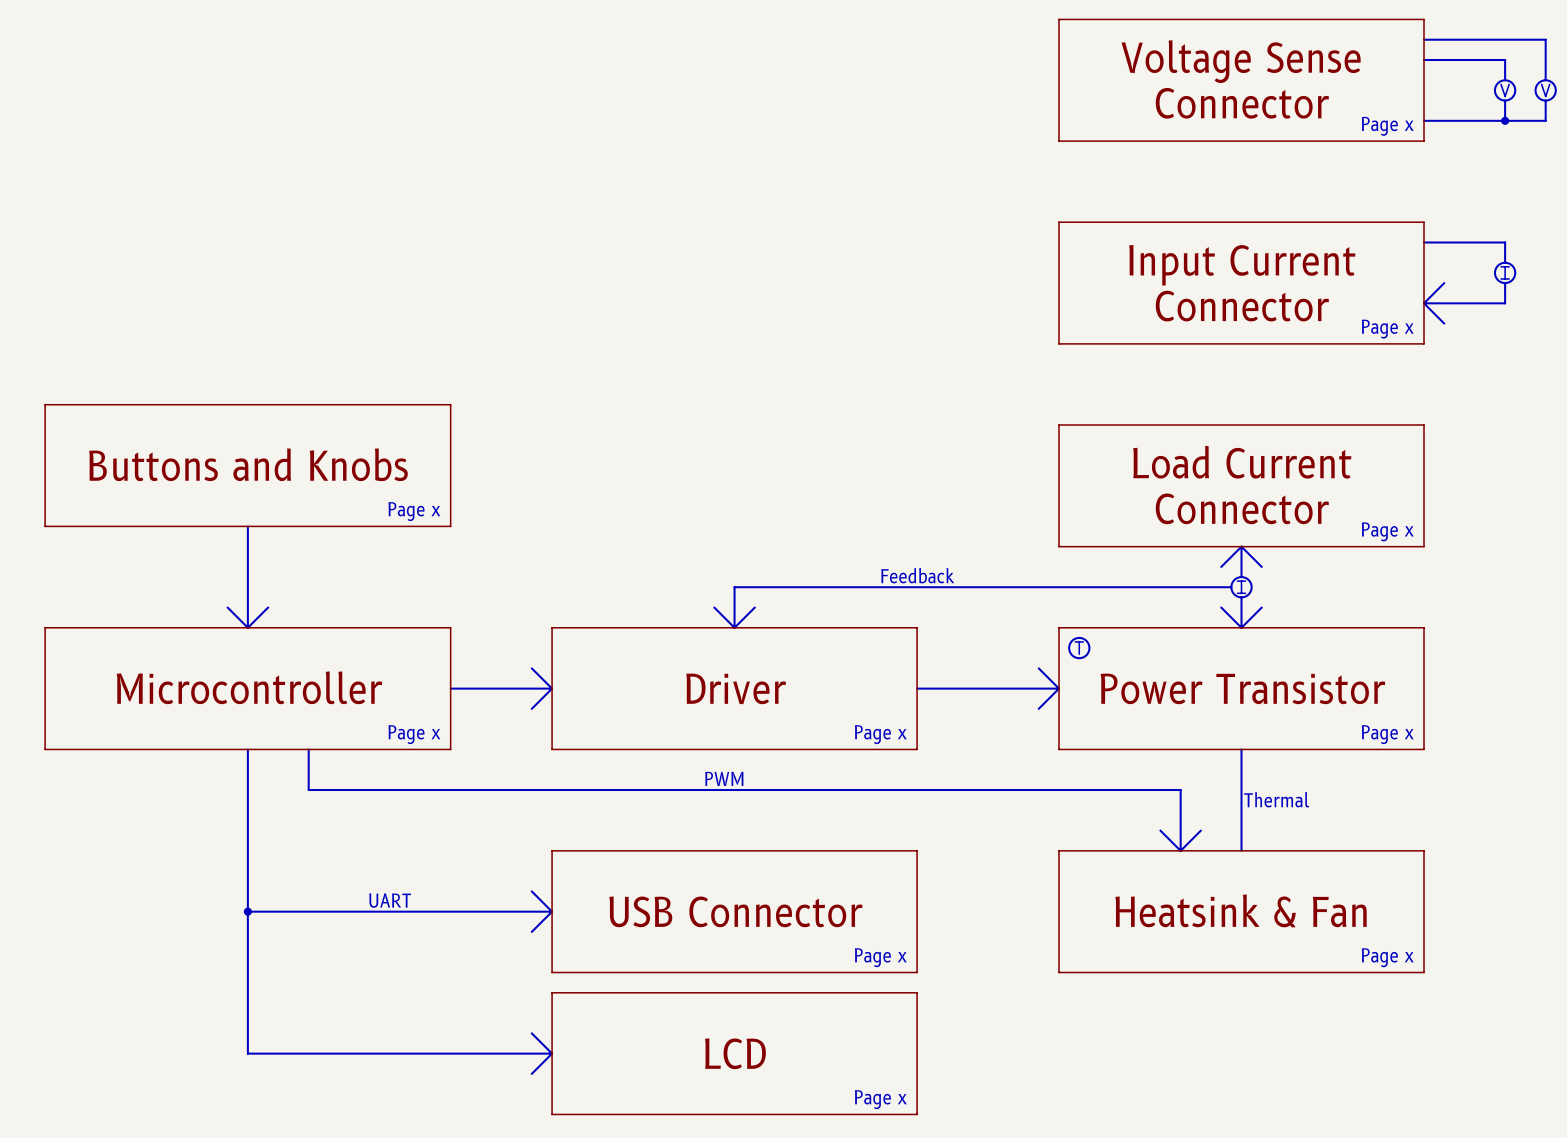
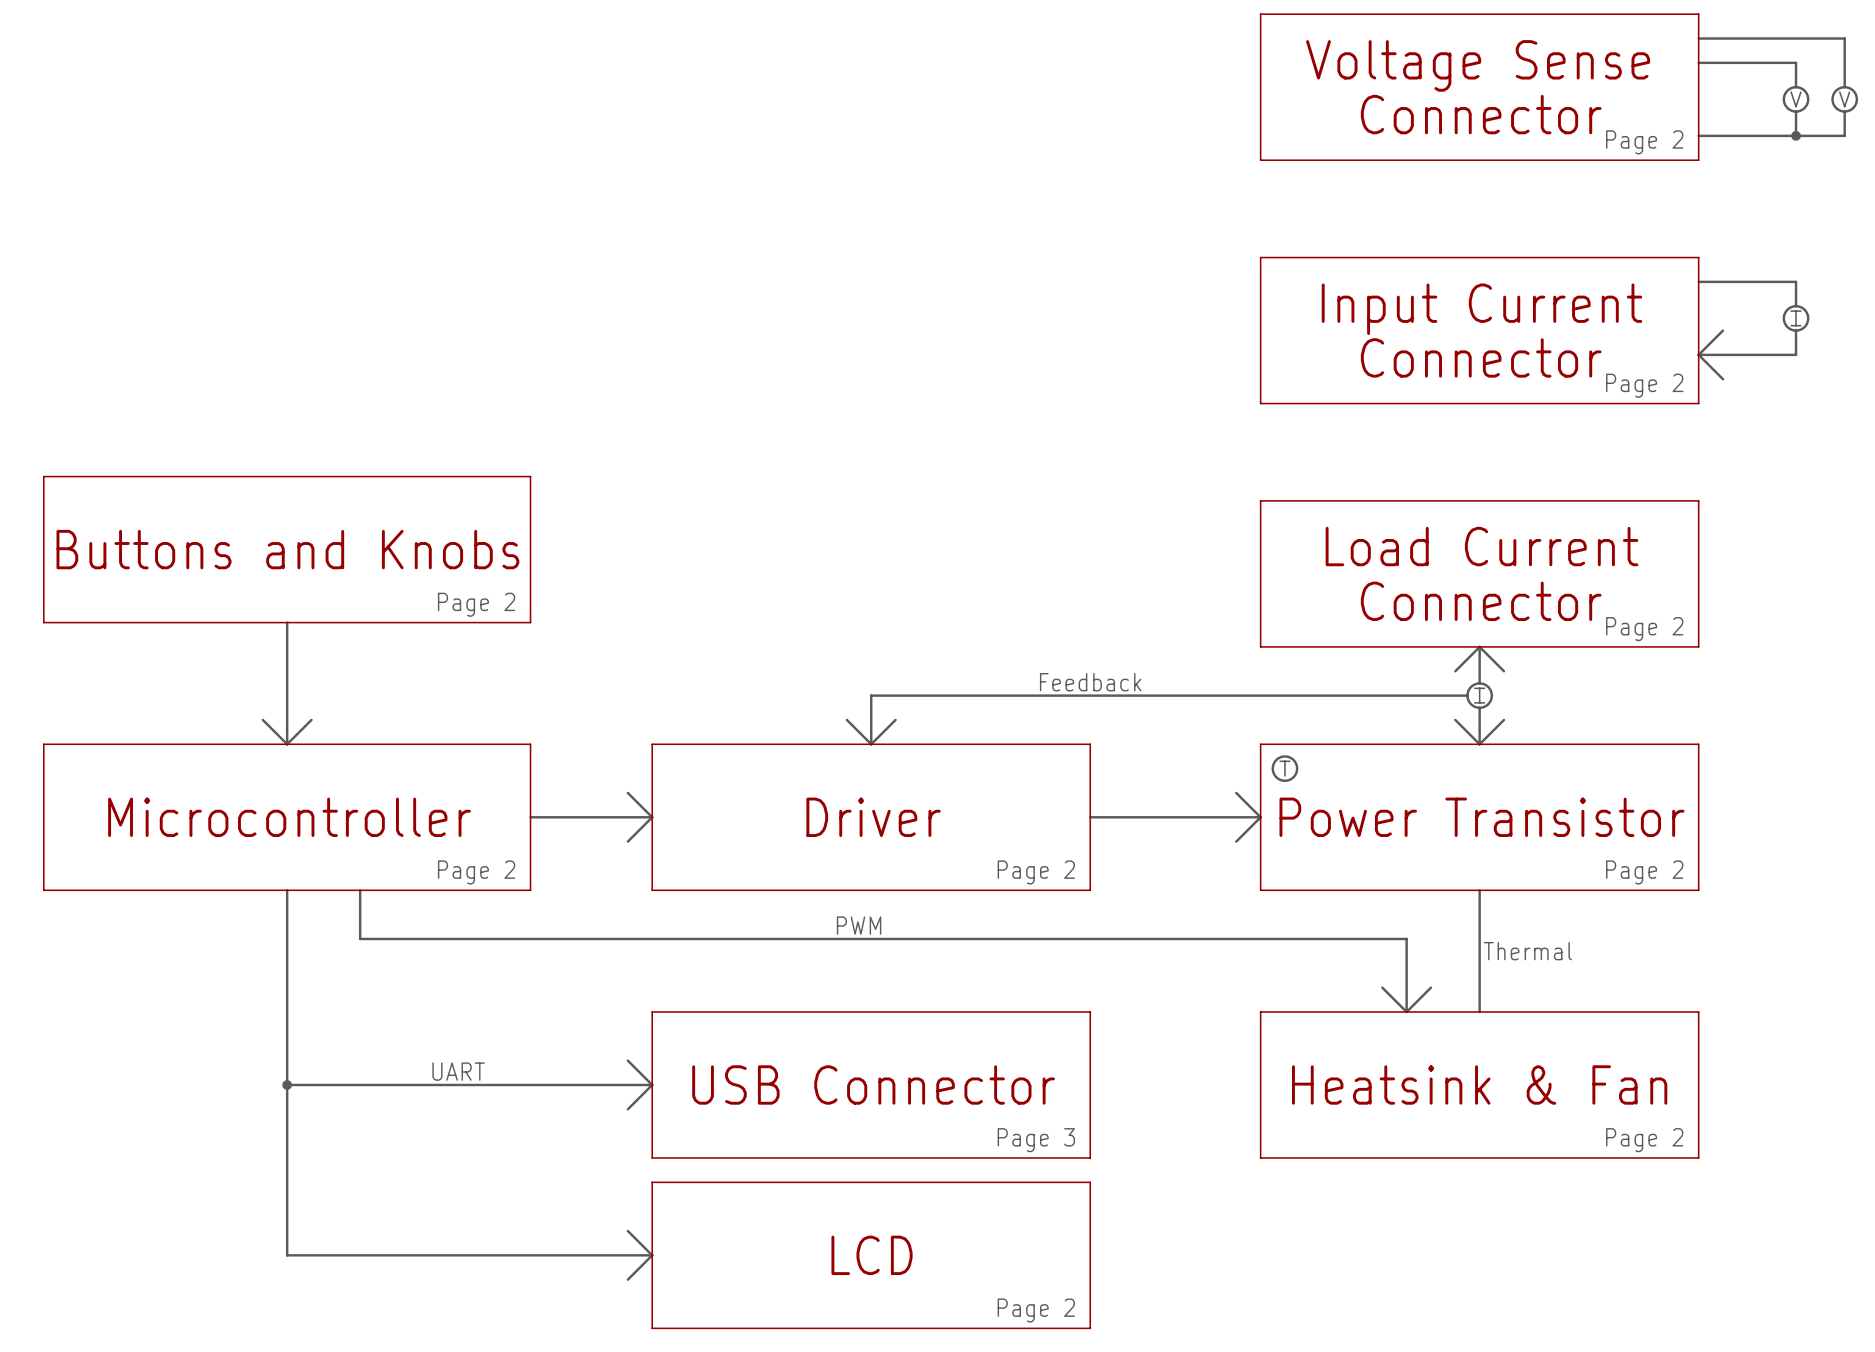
text: Page x (1387, 126) -> Page 2 (1644, 142)
text: Page x (1387, 329) -> Page 2 (1644, 385)
text: Page x (414, 511) -> Page 2 (476, 604)
text: Page x (1387, 531) -> Page 2 (1644, 629)
text: Page x (414, 734) -> Page 2 (476, 872)
text: Page x (880, 734) -> Page 2 (1036, 872)
text: Page x (1387, 734) -> Page 2 (1644, 872)
text: Page x (880, 957) -> Page 3 (1036, 1140)
text: Page x (1387, 957) -> Page 2 (1644, 1140)
text: Page x (880, 1099) -> Page 2 (1036, 1310)

